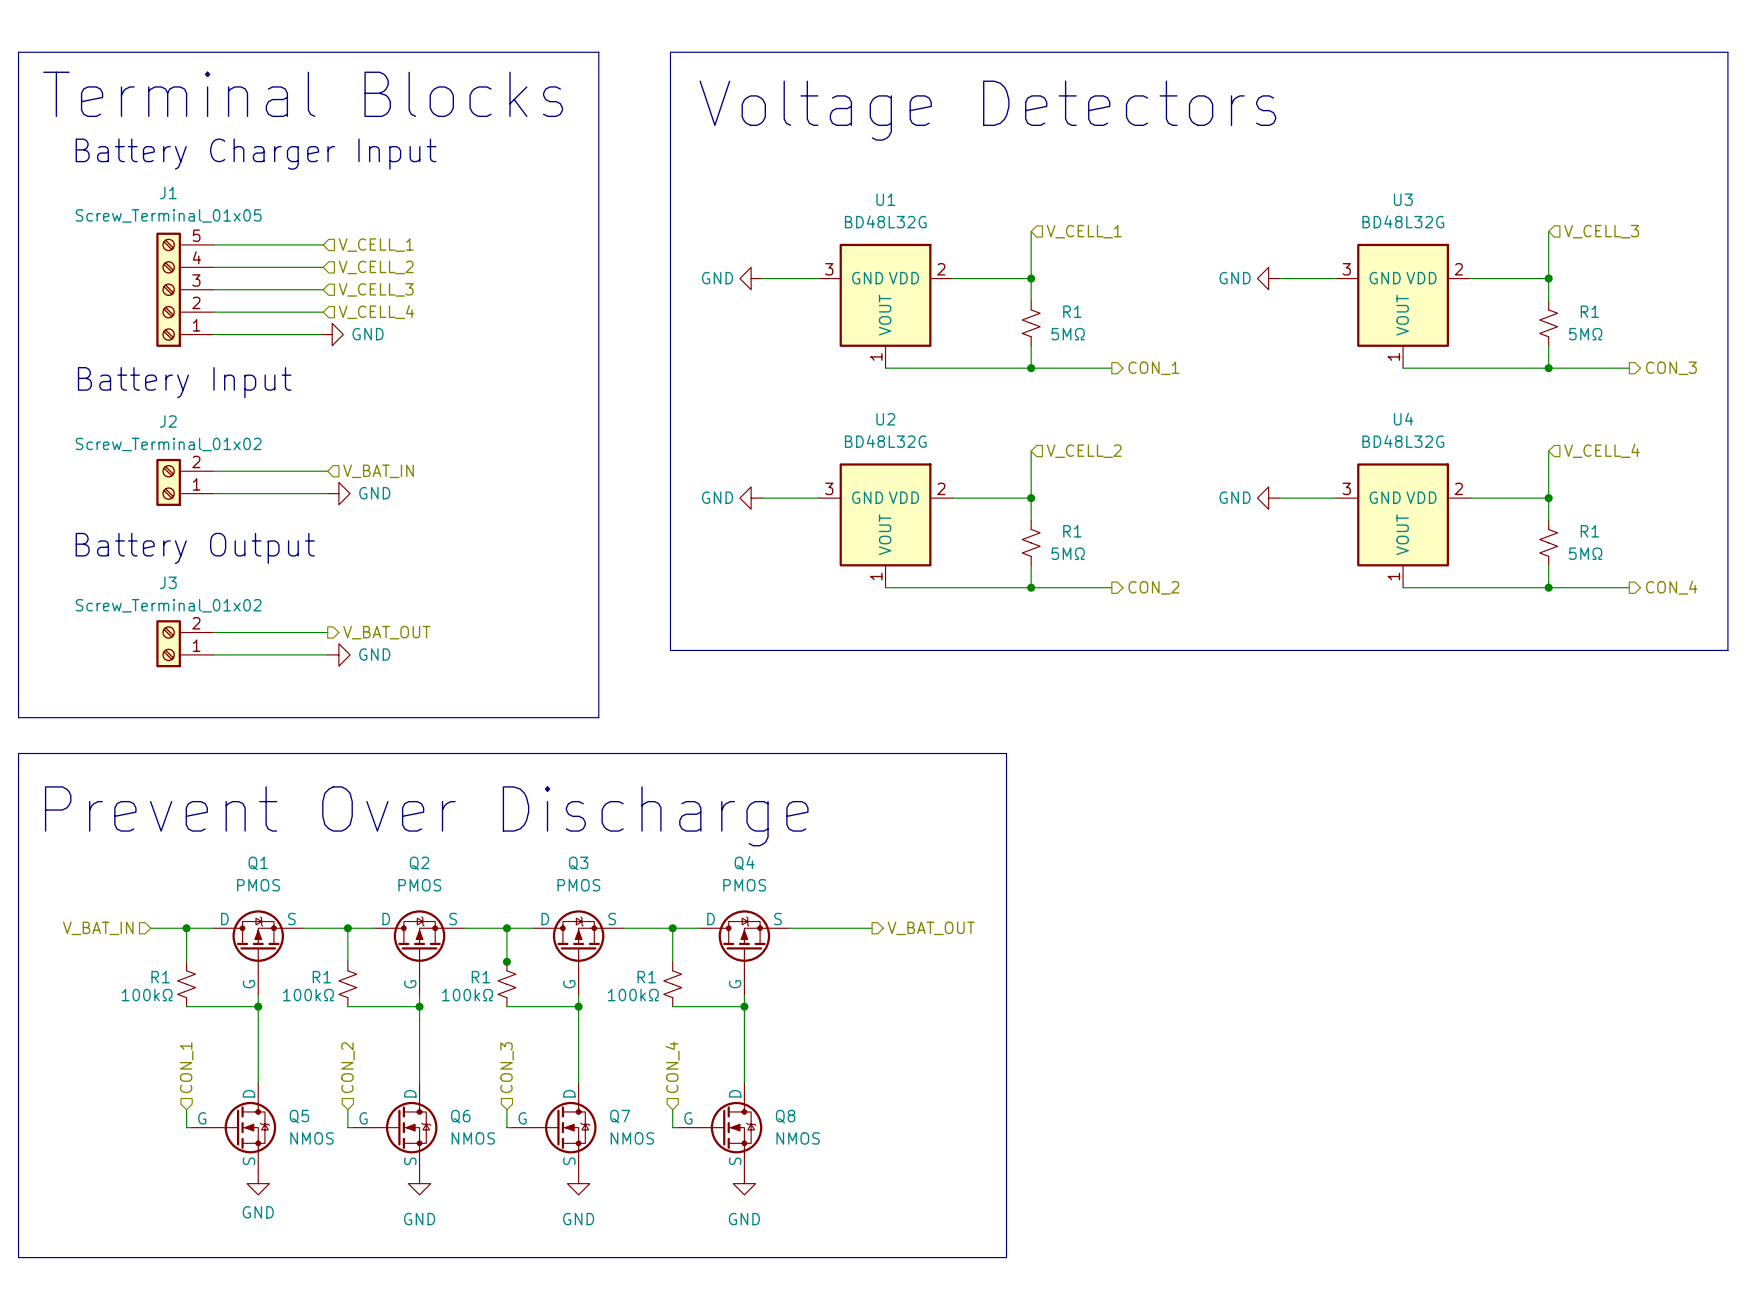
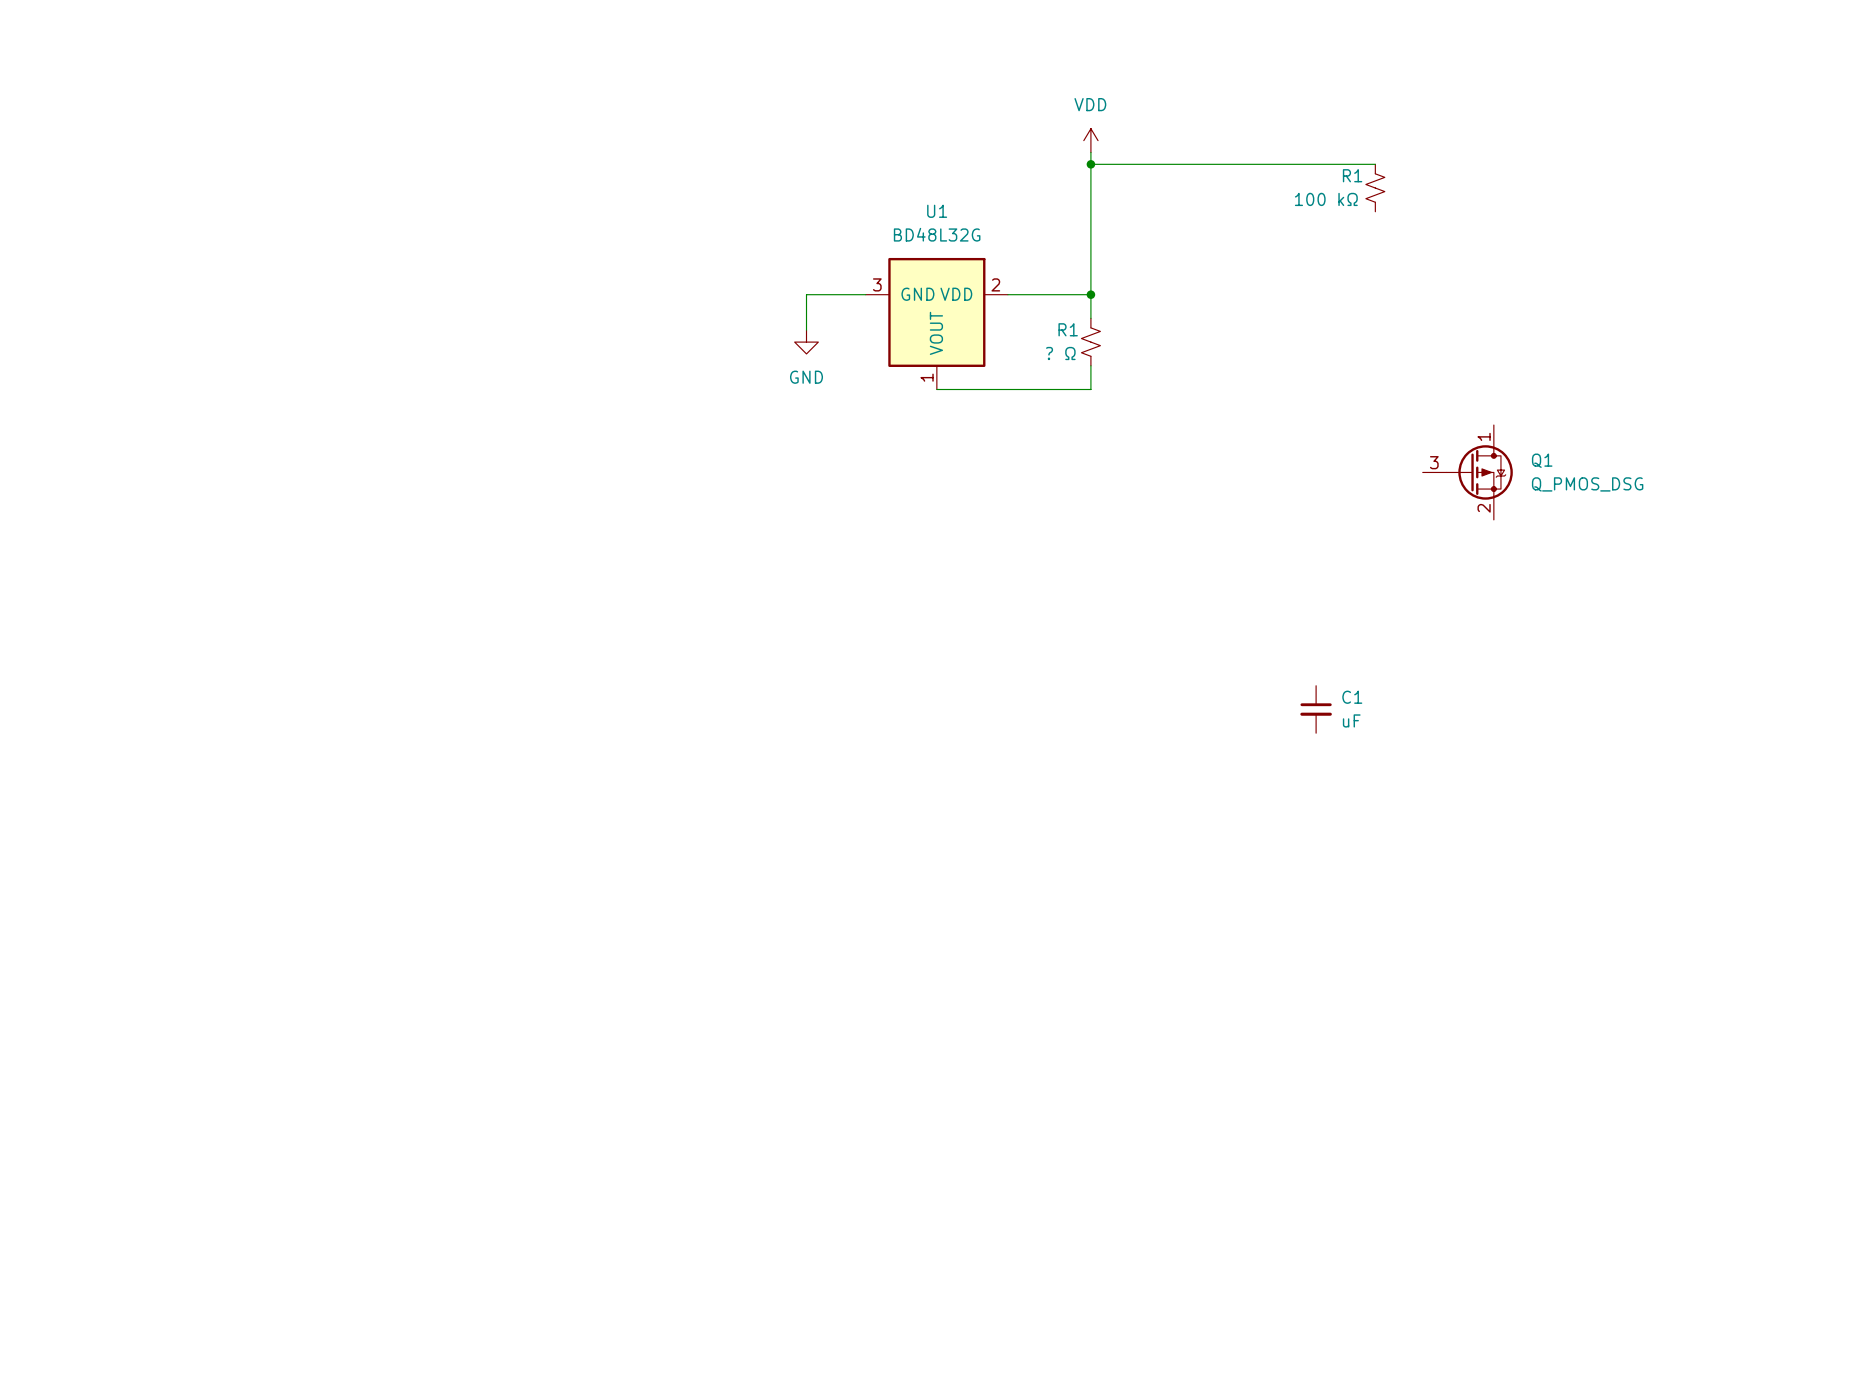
line: (18, 52) (18, 717) (598, 717) (598, 52) (18, 52) -> none
line: (670, 52) (1727, 52) (1727, 650) (670, 650) (670, 52) -> none
text: Terminal Blocks (303, 94) -> none
text: Voltage Detectors (987, 110) -> none
power symbol: none -> VDD (1090, 140)
wire: none -> (1090, 152) (1090, 244)
text: Battery Charger Input (256, 154) -> none
wire: none -> (1090, 164) (1375, 164)
junction: none -> (1090, 164)
R1: none -> 100 kΩ (1375, 188)
hierarchical label: V_CELL_1 (1084, 231) -> none
wire: (1548, 231) (1548, 300) -> none
hierarchical label: V_CELL_3 (1601, 231) -> none
wire: (213, 244) (323, 244) -> none
hierarchical label: V_CELL_1 (376, 245) -> none
wire: (213, 267) (323, 267) -> none
hierarchical label: V_CELL_2 (376, 267) -> none
power symbol rotation: 0° (751, 278) -> 90° counterclockwise (806, 342)
power symbol position: GND (751, 278) -> GND (806, 342)
wire: none -> (806, 294) (806, 330)
power symbol: GND (1268, 278) -> none
wire: (1279, 278) (1335, 278) -> none
wire: (1470, 278) (1548, 278) -> none
junction: (1548, 278) -> none
J1: Screw_Terminal_01x05 (184, 289) -> none
wire: (213, 289) (323, 289) -> none
hierarchical label: V_CELL_3 (376, 289) -> none
U3: BD48L32G (1403, 305) -> none
R1 name position: R1 (1072, 311) -> R1 (1068, 329)
wire: (213, 312) (323, 312) -> none
hierarchical label: V_CELL_4 (376, 312) -> none
R1: 5MΩ (1548, 323) -> none
wire: (213, 334) (320, 334) -> none
power symbol: GND (332, 334) -> none
R1 value: 5MΩ (1068, 334) -> ? Ω (1060, 353)
wire: (1548, 345) (1548, 368) -> none
wire: (1031, 368) (1111, 368) -> none
junction: (1031, 368) -> none
hierarchical label: CON_1 (1153, 368) -> none
wire: (1403, 368) (1629, 368) -> none
junction: (1548, 368) -> none
hierarchical label: CON_3 (1671, 368) -> none
text: Battery Input (184, 382) -> none
hierarchical label: V_CELL_4 (1601, 450) -> none
wire: (1031, 451) (1031, 520) -> none
hierarchical label: V_CELL_2 (1084, 451) -> none
wire: (1548, 451) (1548, 520) -> none
wire: (213, 471) (327, 471) -> none
hierarchical label: V_BAT_IN (378, 471) -> none
J2: Screw_Terminal_01x02 (184, 482) -> none
wire: (213, 493) (327, 493) -> none
power symbol: GND (338, 493) -> none
power symbol: GND (751, 498) -> none
wire: (762, 498) (818, 498) -> none
wire: (952, 498) (1031, 498) -> none
junction: (1031, 498) -> none
power symbol: GND (1268, 498) -> none
wire: (1279, 498) (1335, 498) -> none
wire: (1470, 498) (1548, 498) -> none
junction: (1548, 498) -> none
U2: BD48L32G (885, 525) -> none
U4: BD48L32G (1403, 525) -> none
R1: 5MΩ (1031, 542) -> none
R1: 5MΩ (1548, 542) -> none
text: Battery Output (195, 548) -> none
wire: (1031, 565) (1031, 587) -> none
wire: (1548, 565) (1548, 587) -> none
wire: (885, 587) (1111, 587) -> none
junction: (1031, 587) -> none
hierarchical label: CON_2 (1153, 587) -> none
wire: (1403, 587) (1629, 587) -> none
junction: (1548, 587) -> none
hierarchical label: CON_4 (1671, 587) -> none
wire: (213, 632) (327, 632) -> none
hierarchical label: V_BAT_OUT (386, 632) -> none
J3: Screw_Terminal_01x02 (184, 643) -> none
wire: (213, 654) (327, 654) -> none
power symbol: GND (338, 654) -> none
C1: none -> uF (1316, 709)
line: (18, 753) (1006, 753) (1006, 1257) (18, 1257) (18, 753) -> none
text: Prevent Over Discharge (426, 816) -> none
Q1 name position: Q1 (258, 863) -> Q1 (1542, 460)
Q1 value: PMOS (258, 885) -> Q_PMOS_DSG (1587, 484)
Q1 symbol: [213, 910, 304, 996] -> [1422, 425, 1513, 520]
hierarchical label: V_BAT_IN (98, 928) -> none
wire: (150, 928) (213, 928) -> none
wire: (186, 928) (186, 961) -> none
junction: (186, 928) -> none
wire: (303, 928) (374, 928) -> none
wire: (347, 928) (347, 961) -> none
junction: (347, 928) -> none
wire: (464, 928) (533, 928) -> none
wire: (506, 928) (506, 964) -> none
junction: (506, 928) -> none
wire: (623, 928) (699, 928) -> none
wire: (672, 928) (672, 961) -> none
junction: (672, 928) -> none
wire: (789, 928) (872, 928) -> none
hierarchical label: V_BAT_OUT (931, 928) -> none
Q2: PMOS (419, 952) -> none
Q3: PMOS (578, 952) -> none
Q4: PMOS (744, 952) -> none
junction: (506, 961) -> none
R1: 100kΩ (186, 984) -> none
R1: 100kΩ (347, 984) -> none
R1: 100kΩ (506, 984) -> none
R1: 100kΩ (672, 984) -> none
wire: (258, 995) (258, 1082) -> none
wire: (419, 995) (419, 1082) -> none
wire: (578, 995) (578, 1082) -> none
wire: (744, 995) (744, 1082) -> none
wire: (186, 1006) (258, 1006) -> none
junction: (258, 1006) -> none
wire: (347, 1006) (419, 1006) -> none
junction: (419, 1006) -> none
wire: (506, 1006) (578, 1006) -> none
junction: (578, 1006) -> none
wire: (672, 1006) (744, 1006) -> none
junction: (744, 1006) -> none
hierarchical label: CON_1 (186, 1067) -> none
hierarchical label: CON_2 (347, 1067) -> none
hierarchical label: CON_3 (507, 1067) -> none
hierarchical label: CON_4 (672, 1067) -> none
wire: (186, 1109) (186, 1127) (191, 1127) -> none
wire: (347, 1109) (347, 1127) (352, 1127) -> none
wire: (506, 1109) (506, 1127) (511, 1127) -> none
wire: (672, 1109) (672, 1127) (677, 1127) -> none
Q5: NMOS (233, 1127) -> none
Q6: NMOS (394, 1127) -> none
Q7: NMOS (553, 1127) -> none
Q8: NMOS (719, 1127) -> none
power symbol: GND (258, 1183) -> none
power symbol: GND (419, 1183) -> none
power symbol: GND (578, 1183) -> none
power symbol: GND (744, 1183) -> none

